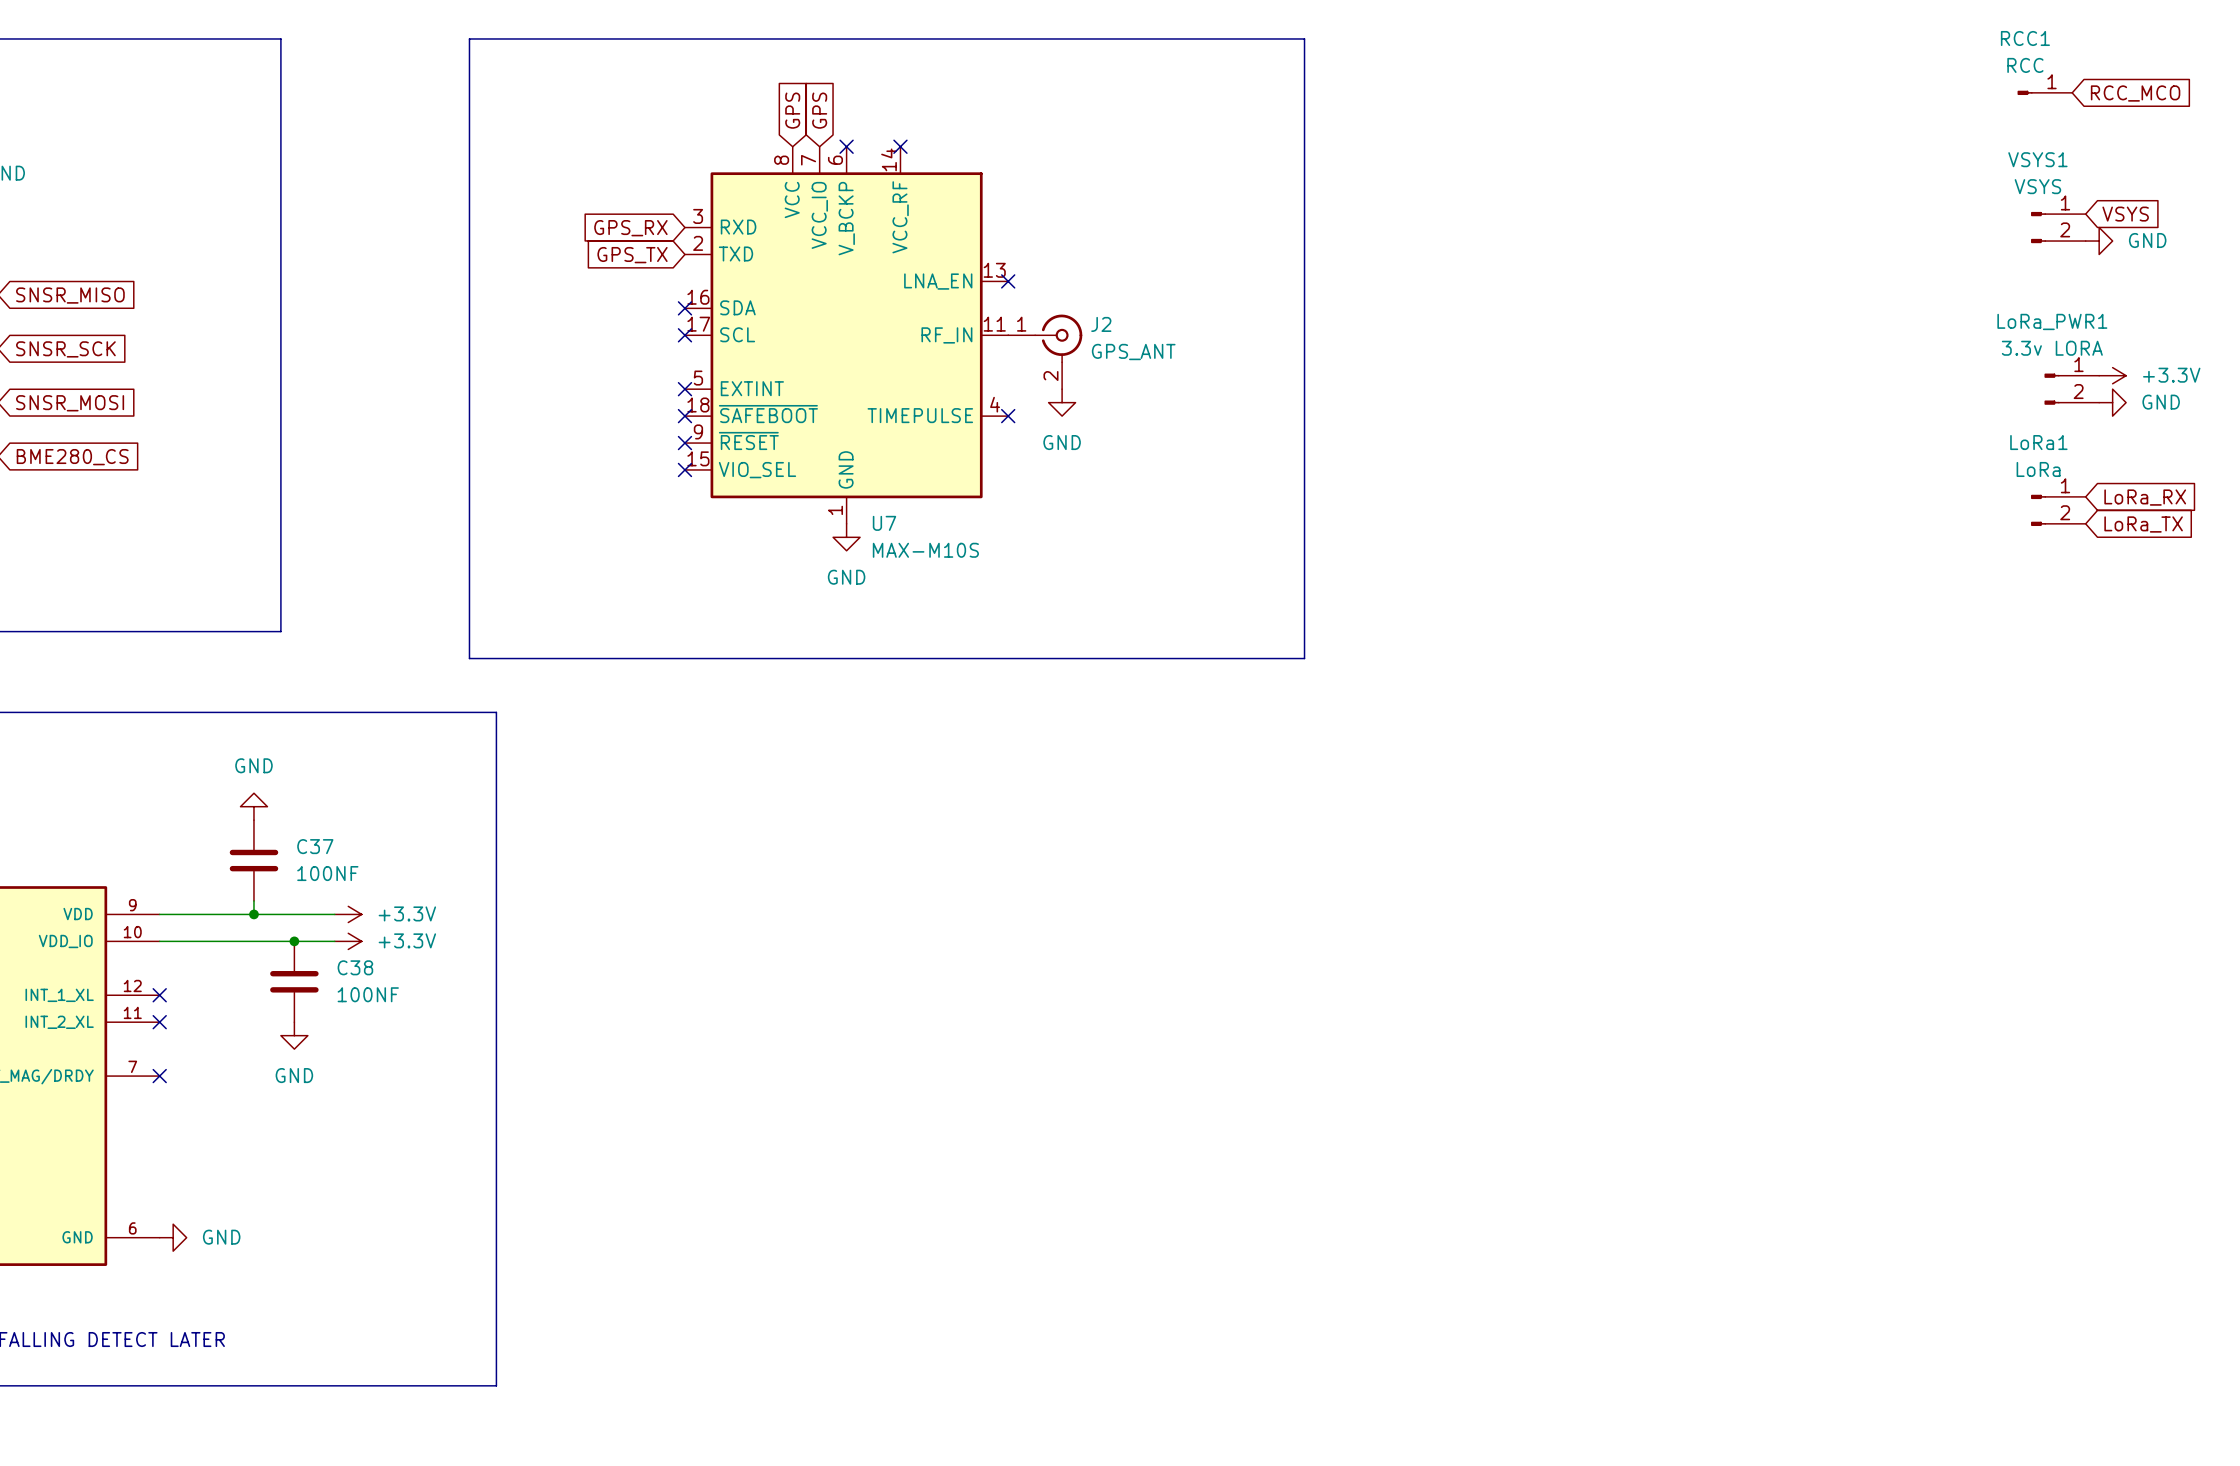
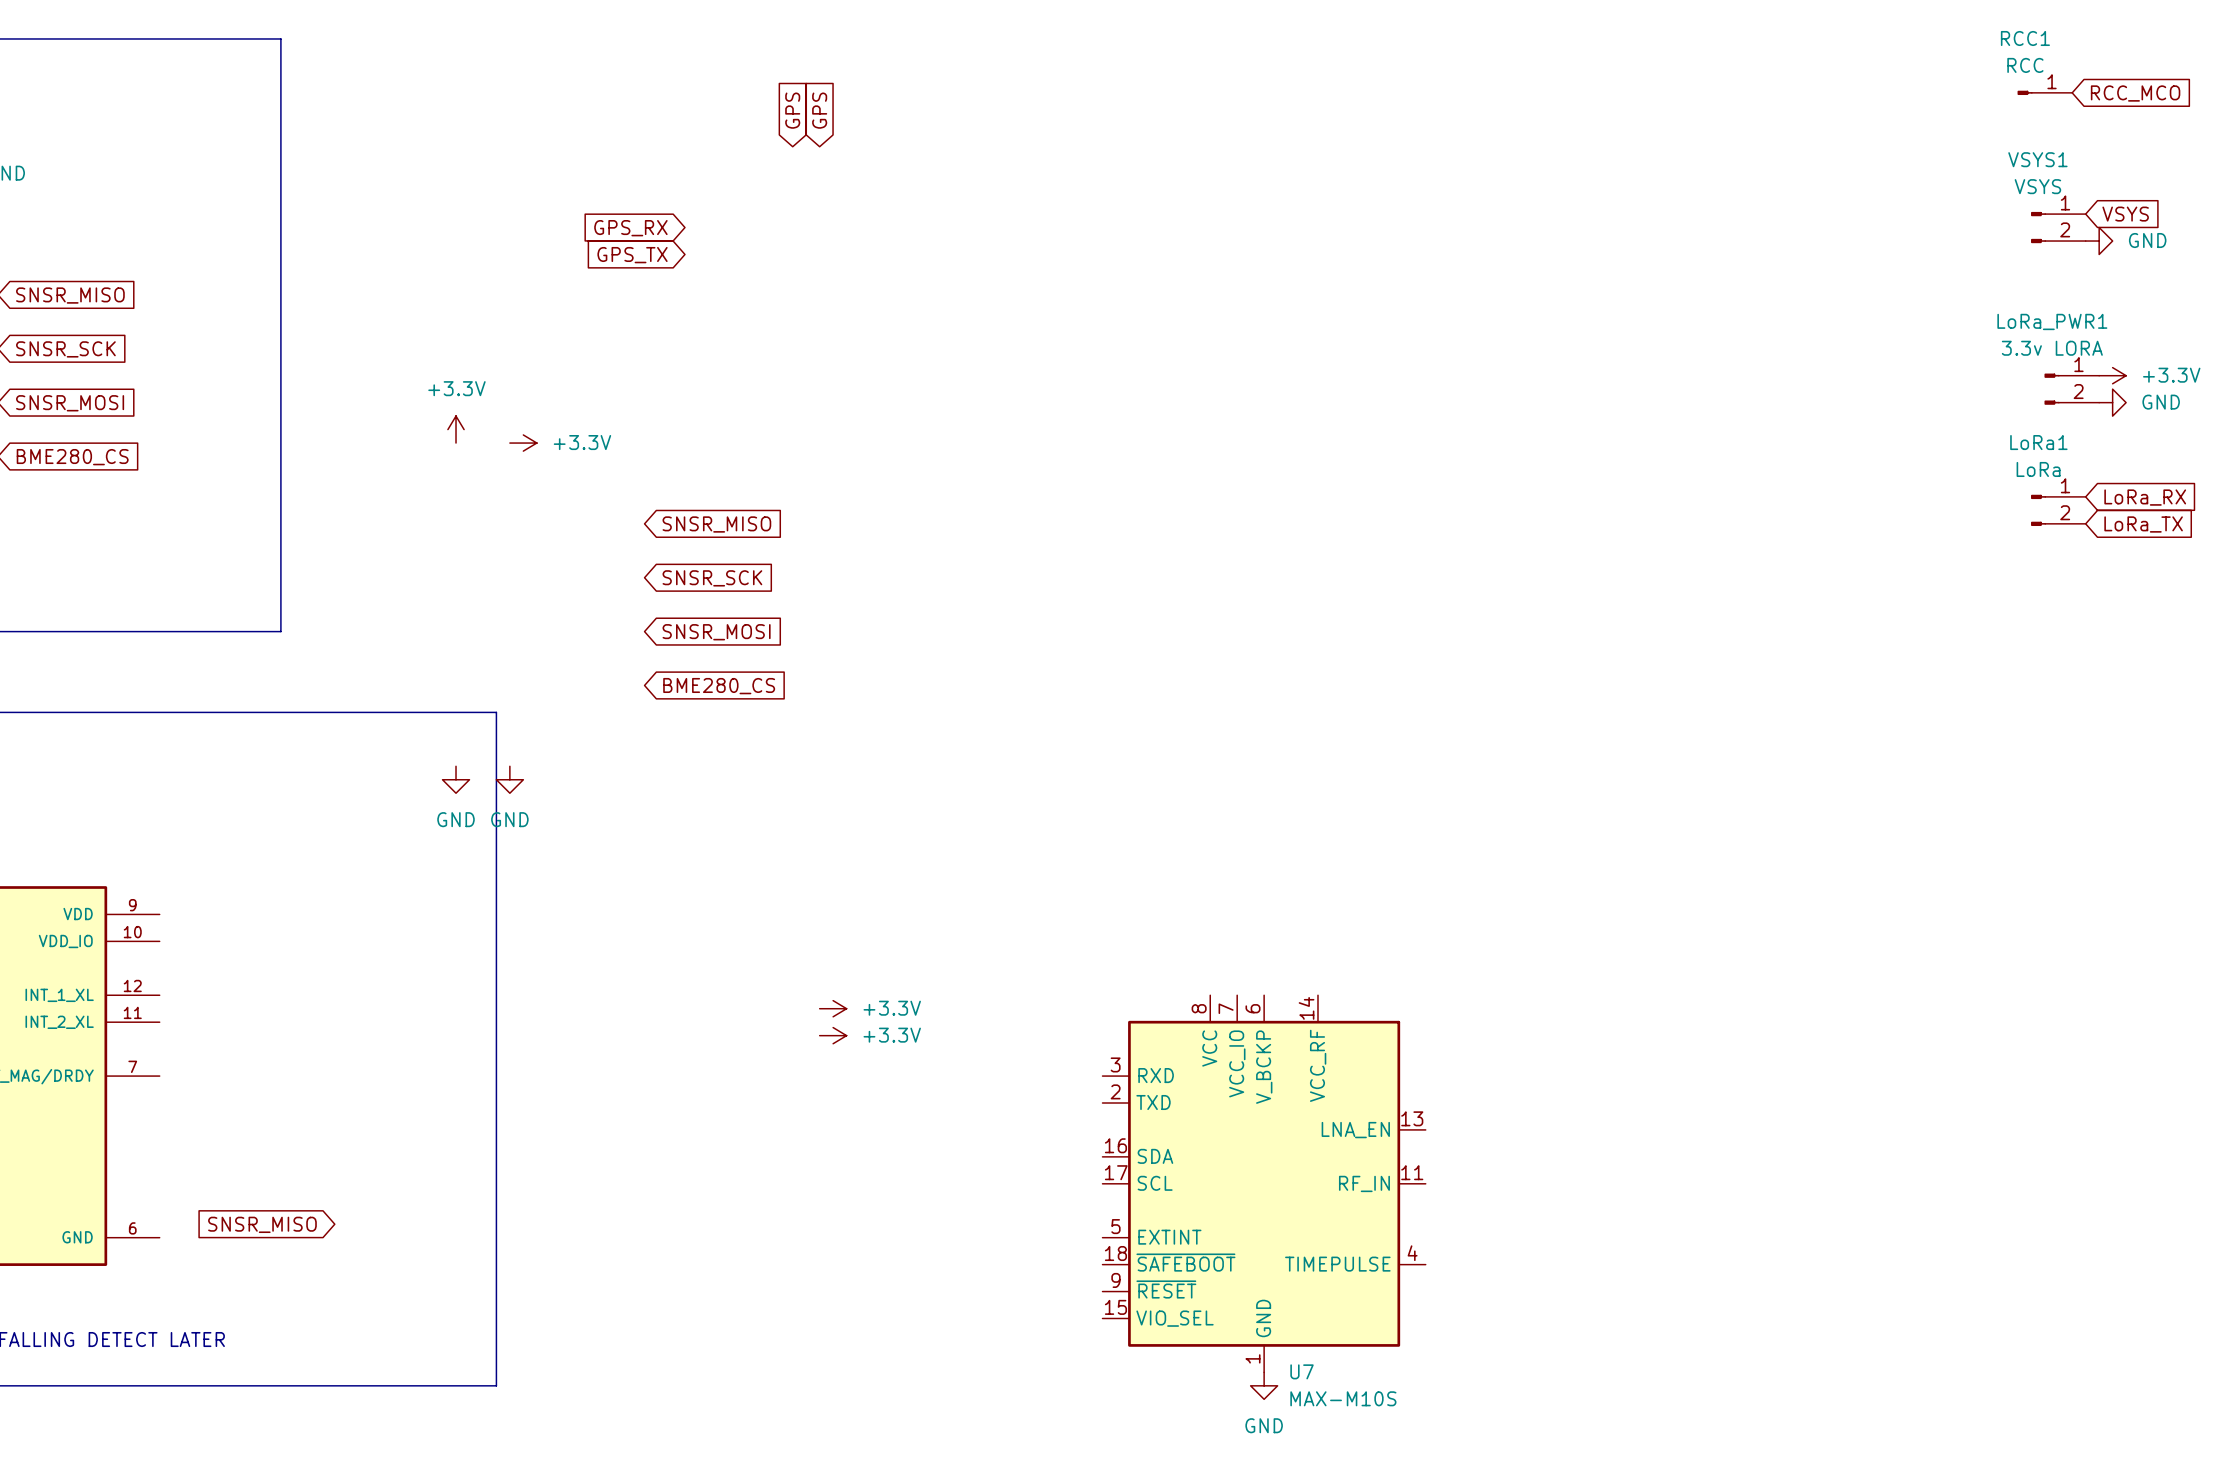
line: (469, 38) (1304, 38) (1304, 658) (469, 658) (469, 38) -> none
no-connect mark: (846, 146) -> none
no-connect mark: (900, 146) -> none
no-connect mark: (1008, 281) -> none
no-connect mark: (684, 308) -> none
no-connect mark: (684, 335) -> none
U7 position: (846, 335) -> (1264, 1183)
J2: GPS_ANT (1045, 351) -> none
no-connect mark: (684, 389) -> none
power symbol: GND (1062, 402) -> none
no-connect mark: (684, 416) -> none
no-connect mark: (1008, 416) -> none
power symbol: none -> +3.3V (456, 429)
power symbol: none -> +3.3V (523, 443)
no-connect mark: (684, 443) -> none
no-connect mark: (684, 469) -> none
global label: none -> SNSR_MISO (716, 524)
power symbol: GND (846, 537) -> none
global label: none -> SNSR_SCK (712, 578)
global label: none -> SNSR_MOSI (716, 632)
global label: none -> BME280_CS (719, 686)
power symbol: none -> GND (456, 779)
power symbol: none -> GND (509, 779)
power symbol: GND (253, 806) -> none
C37: 100NF (253, 860) -> none
wire: (253, 900) (253, 914) -> none
wire: (159, 914) (334, 914) -> none
junction: (253, 914) -> none
power symbol: +3.3V (348, 914) -> none
wire: (159, 941) (334, 941) -> none
junction: (294, 941) -> none
power symbol: +3.3V (348, 941) -> none
C38: 100NF (294, 981) -> none
no-connect mark: (159, 995) -> none
power symbol: none -> +3.3V (833, 1008)
no-connect mark: (159, 1022) -> none
power symbol: GND (294, 1035) -> none
power symbol: none -> +3.3V (833, 1035)
no-connect mark: (159, 1076) -> none
global label: none -> SNSR_MISO (262, 1224)
power symbol: GND (173, 1237) -> none
power symbol: none -> GND (1264, 1385)

